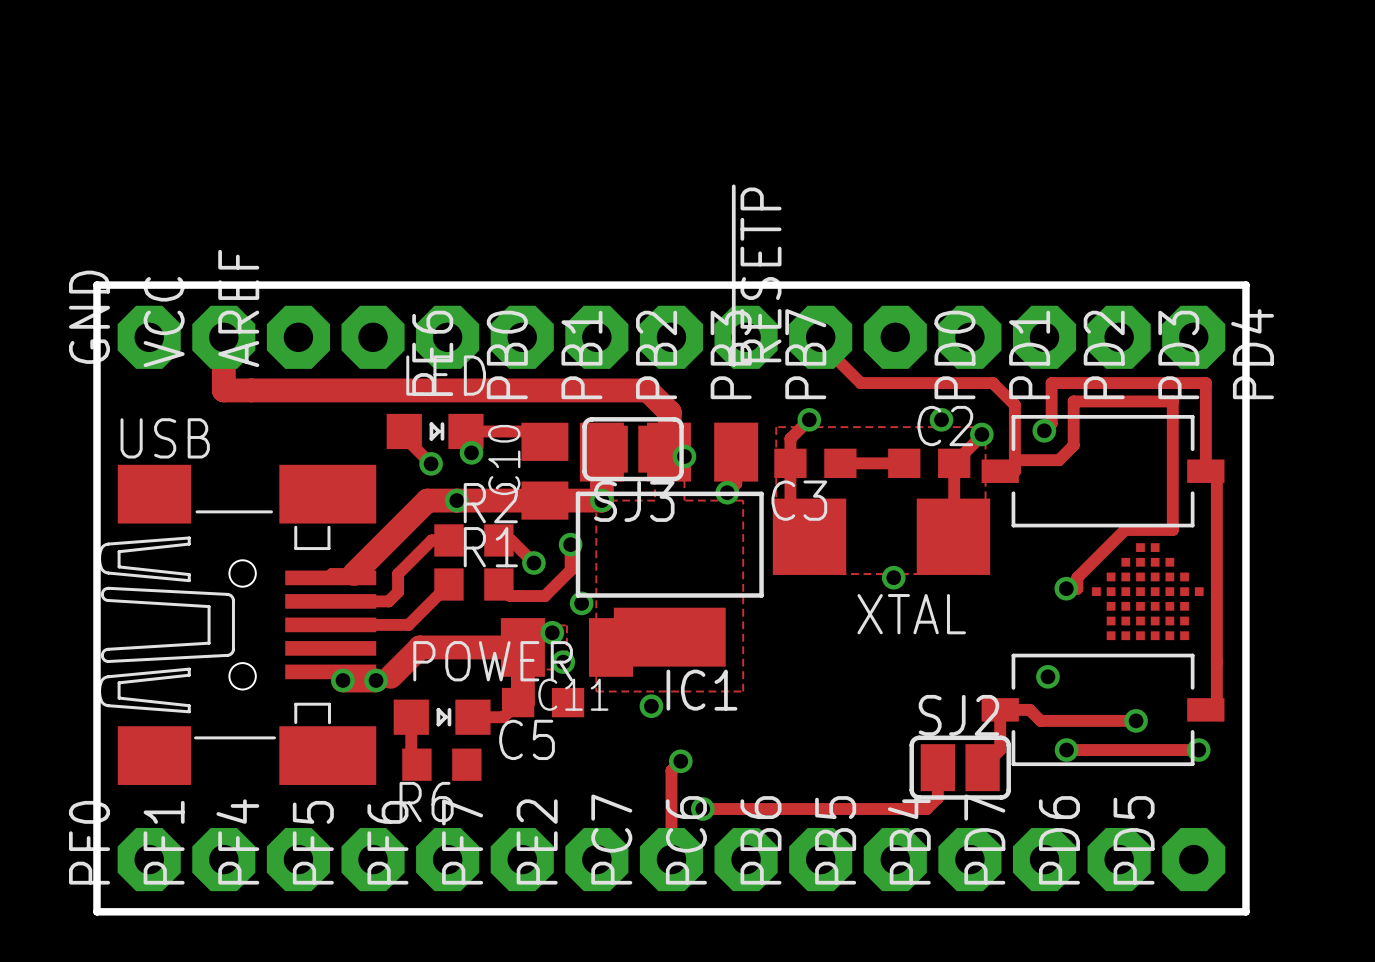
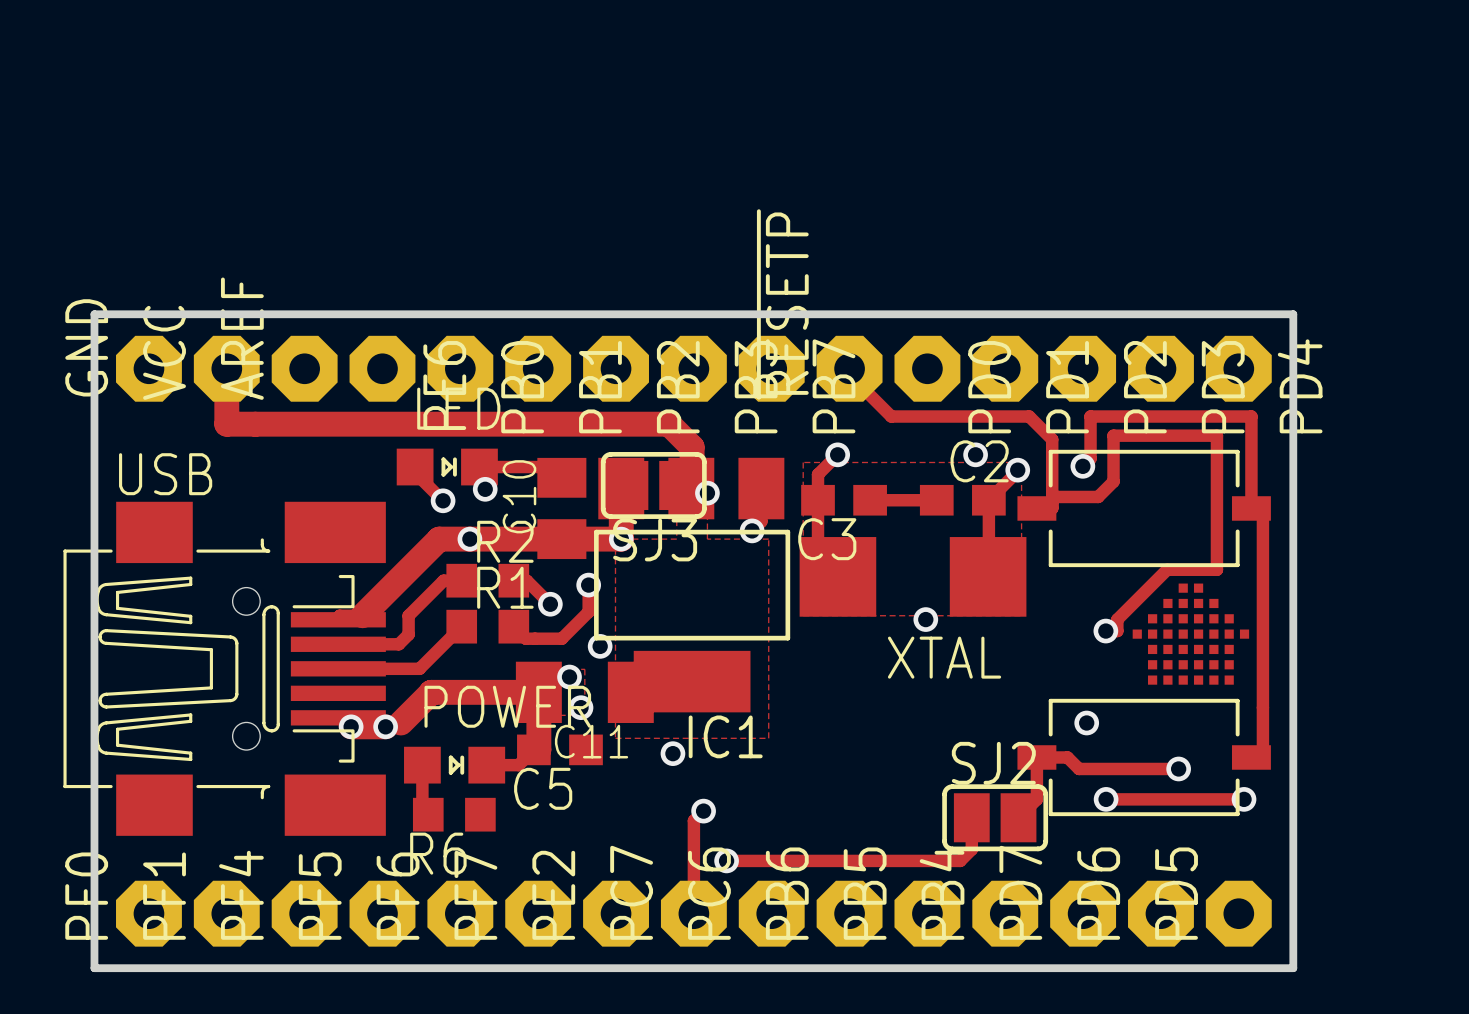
USB footprint: [98, 464, 377, 785] -> [63, 501, 386, 836]

